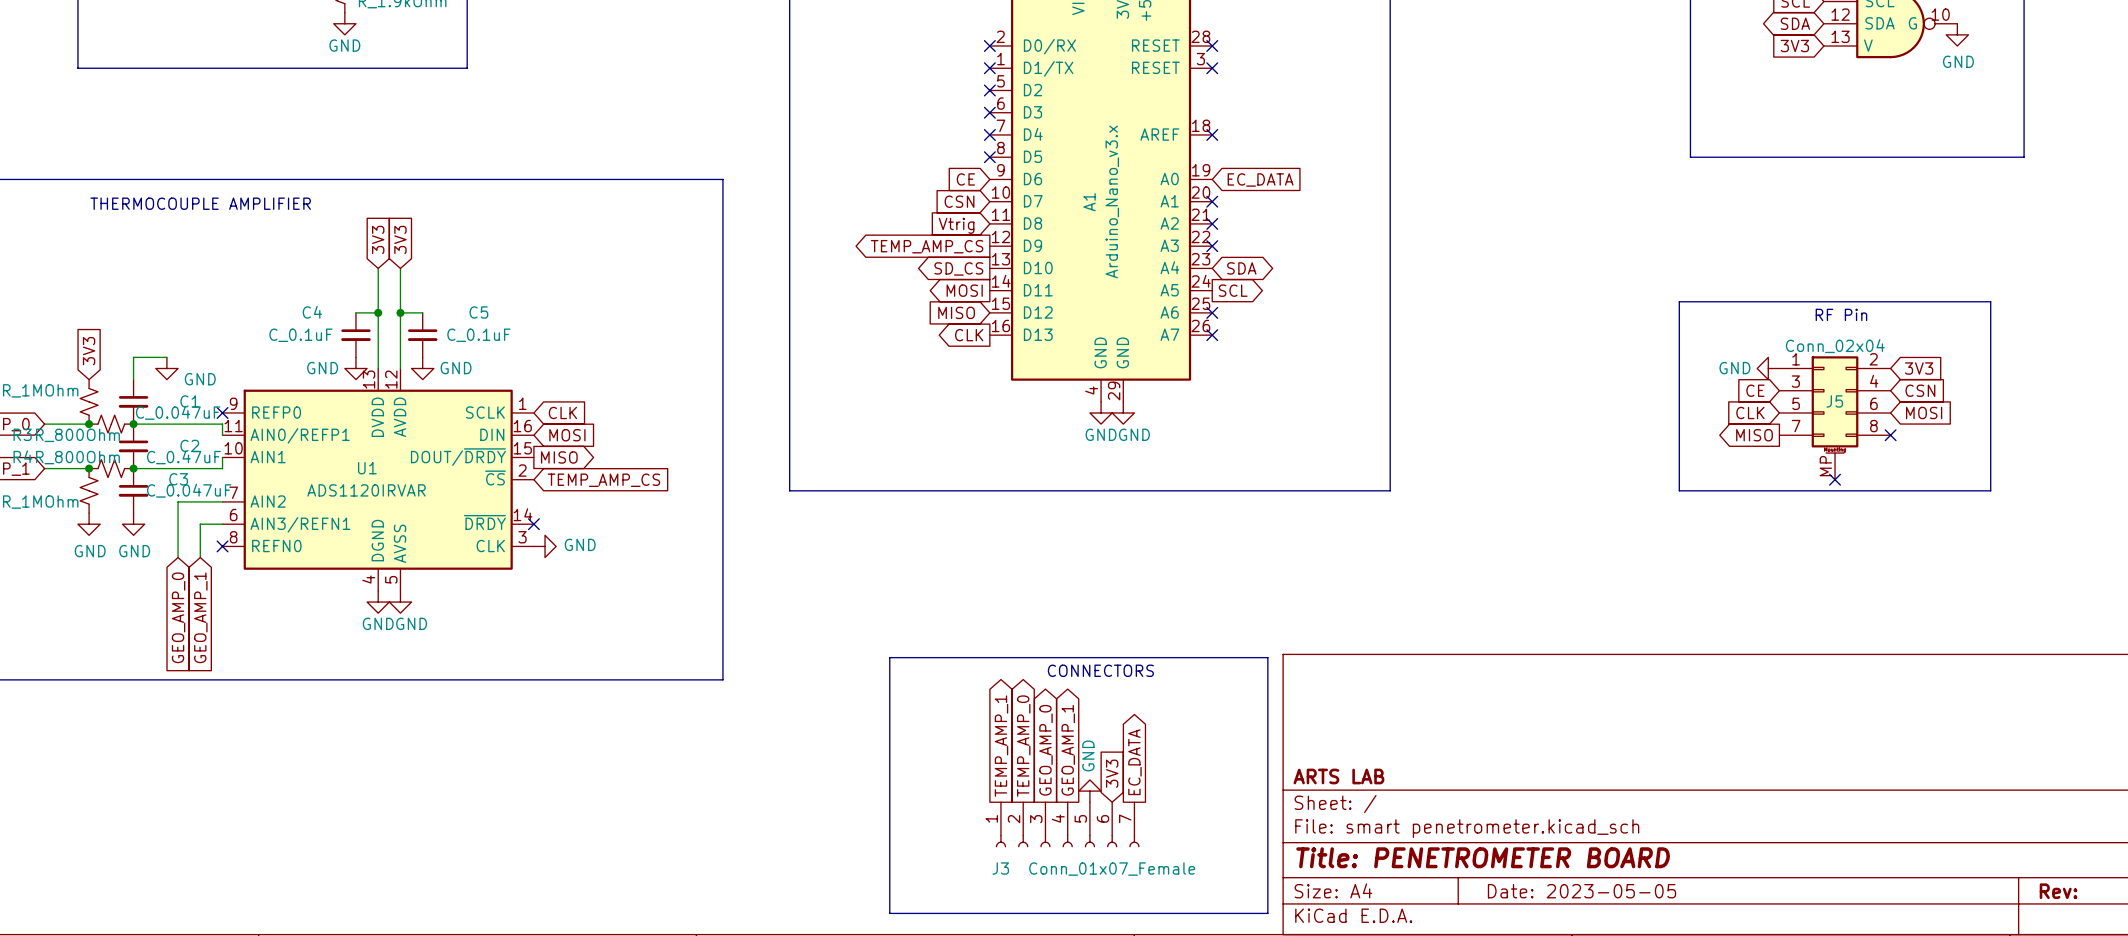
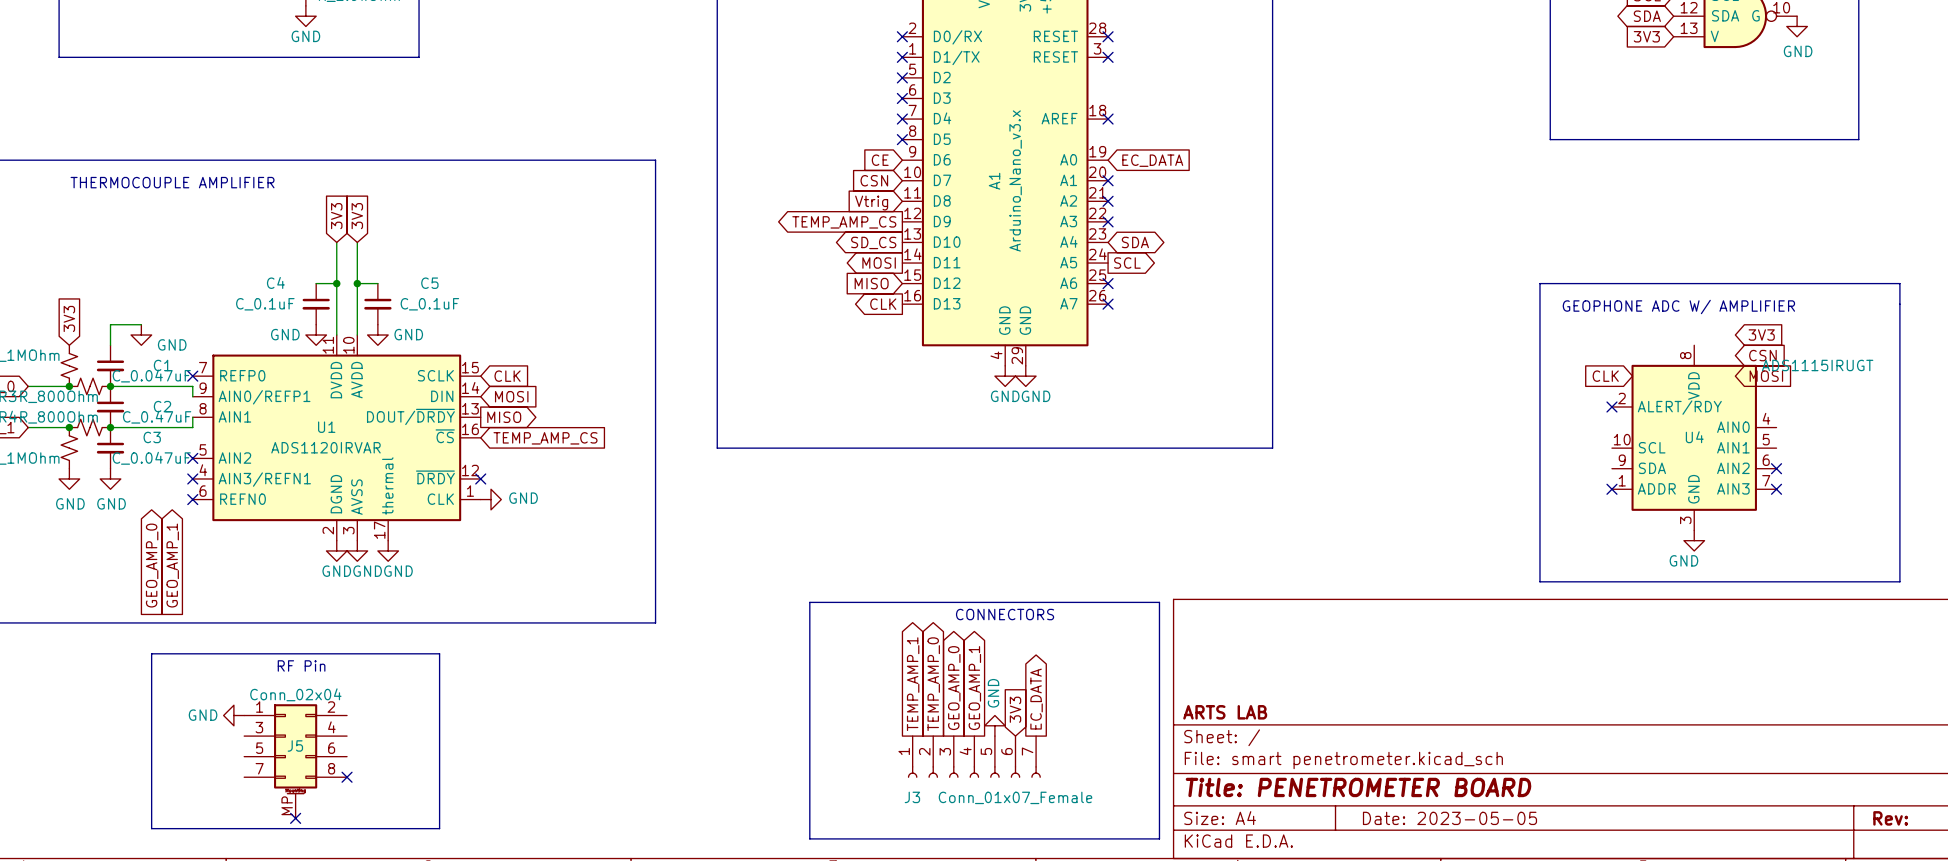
line: (1679, 312) (1679, 301) (1990, 301) (1990, 490) (1679, 490) -> (1539, 283) (1899, 283) (1899, 581) (1539, 581) (1539, 448)
text: RF Pin (1841, 314) -> none
text: none -> GEOPHONE ADC W/ AMPLIFIER (1678, 306)
U1 symbol: [222, 368, 534, 591] -> [192, 335, 481, 541]
power symbol: GND (1768, 368) -> none
global label: CE (1755, 390) -> none
J5 position: (1835, 417) -> (295, 761)
global label: MISO (1754, 435) -> none
no-connect mark: (1890, 435) -> none
no-connect mark: none -> (1611, 407)
no-connect mark: (1835, 479) -> none
U4: none -> ADS1115IRUGT (1694, 437)
C3 value position: C_0.047uF (189, 490) -> C_0.047uF (151, 458)
wire: (222, 501) (178, 501) (178, 557) -> none
no-connect mark: none -> (192, 458)
no-connect mark: none -> (1776, 468)
wire: (222, 524) (200, 524) (200, 557) -> none
no-connect mark: none -> (192, 478)
no-connect mark: none -> (1611, 489)
no-connect mark: none -> (1776, 489)
power symbol: none -> GND (1694, 540)
power symbol: none -> GND (388, 550)
line: none -> (151, 653) (439, 653) (439, 828) (151, 828) (151, 653)
text: none -> RF Pin (301, 665)
power symbol: none -> GND (233, 715)
no-connect mark: none -> (347, 777)
no-connect mark: none -> (295, 818)

